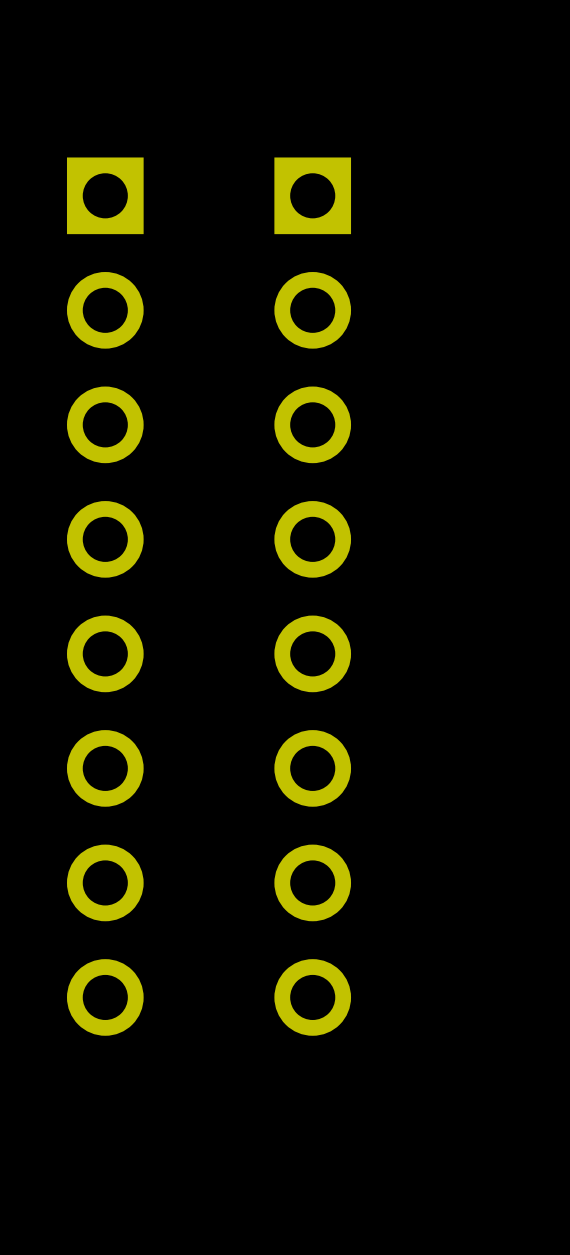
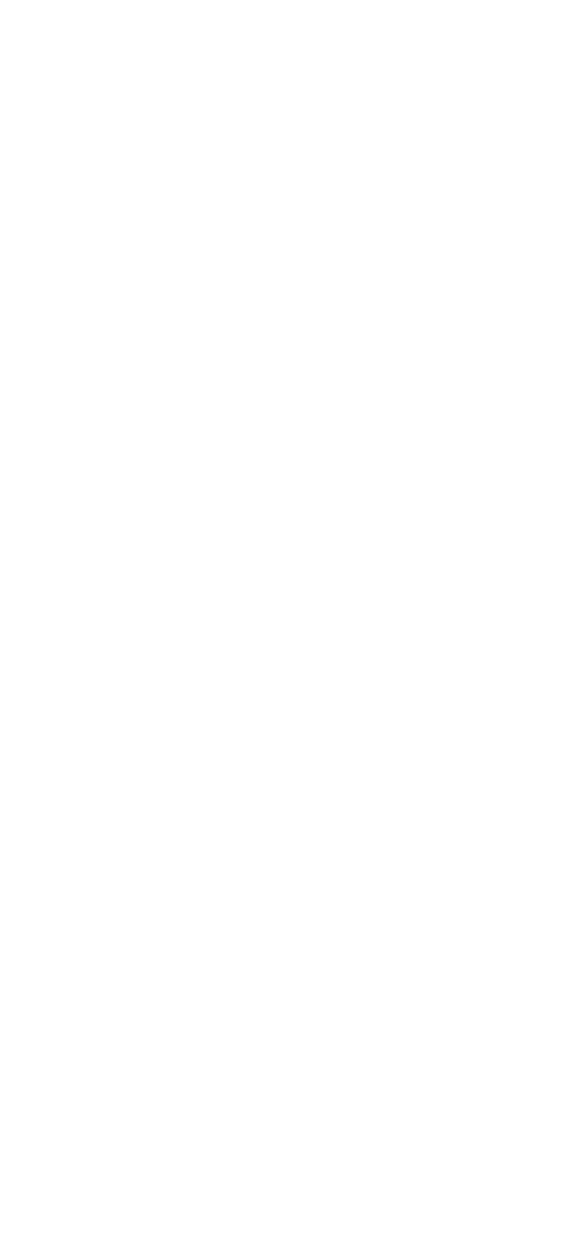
part: (105, 596) -> none
part: (312, 596) -> none

